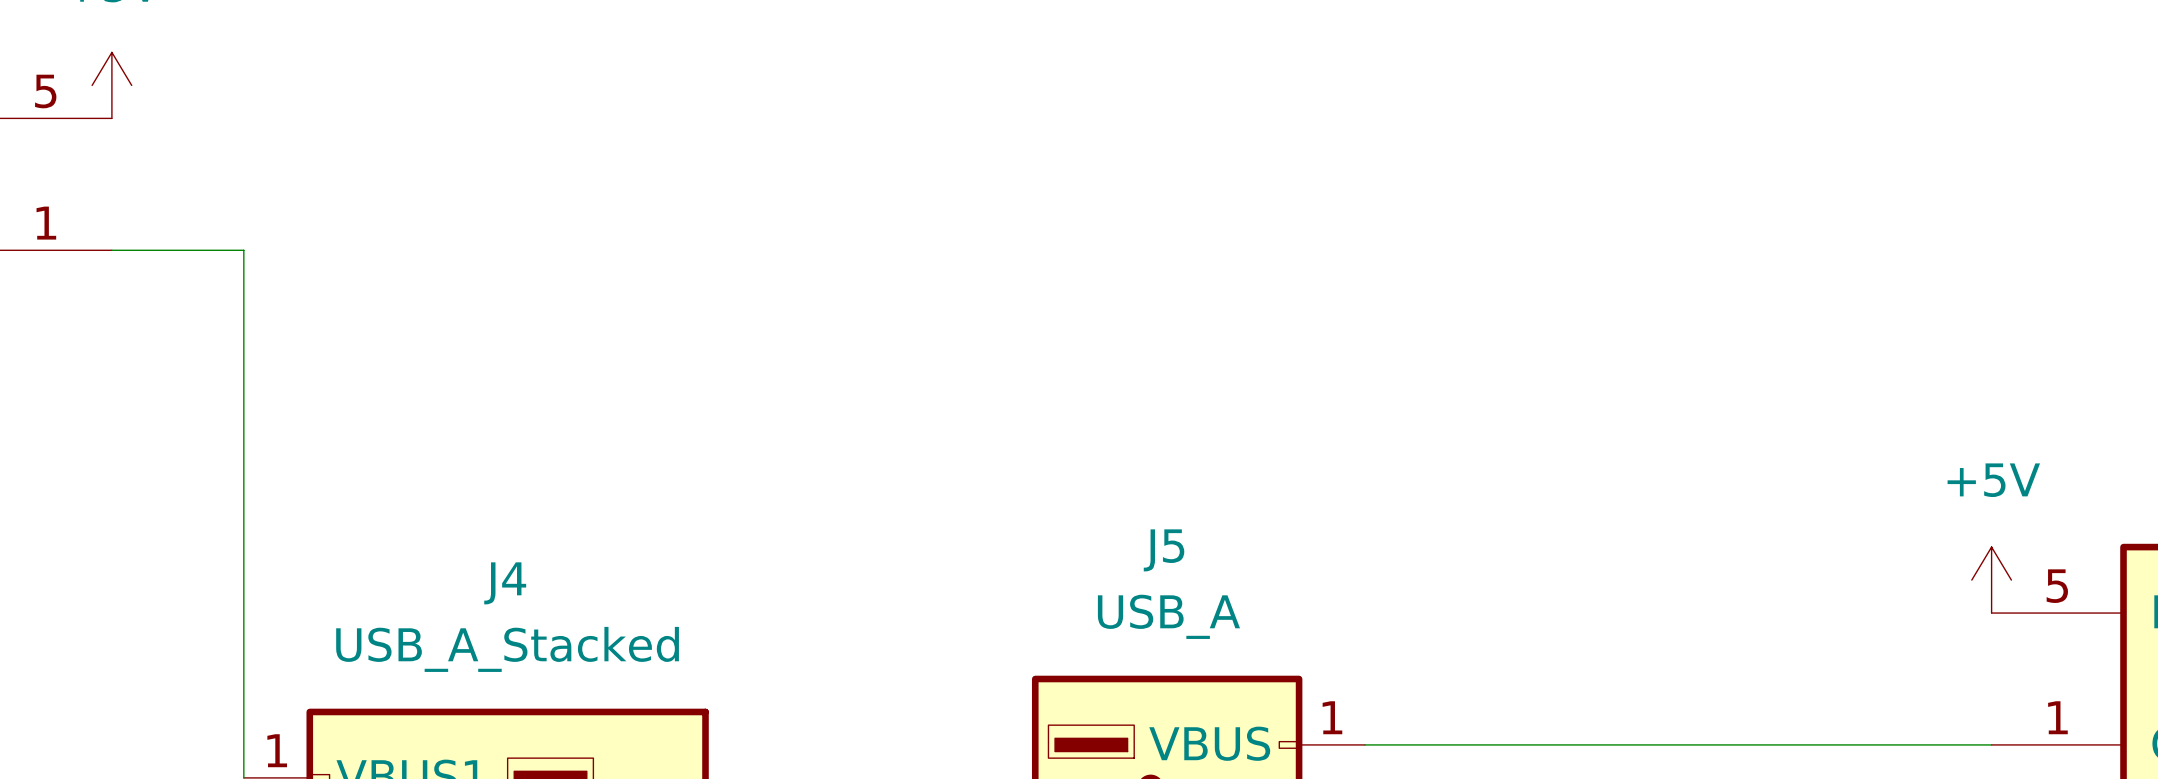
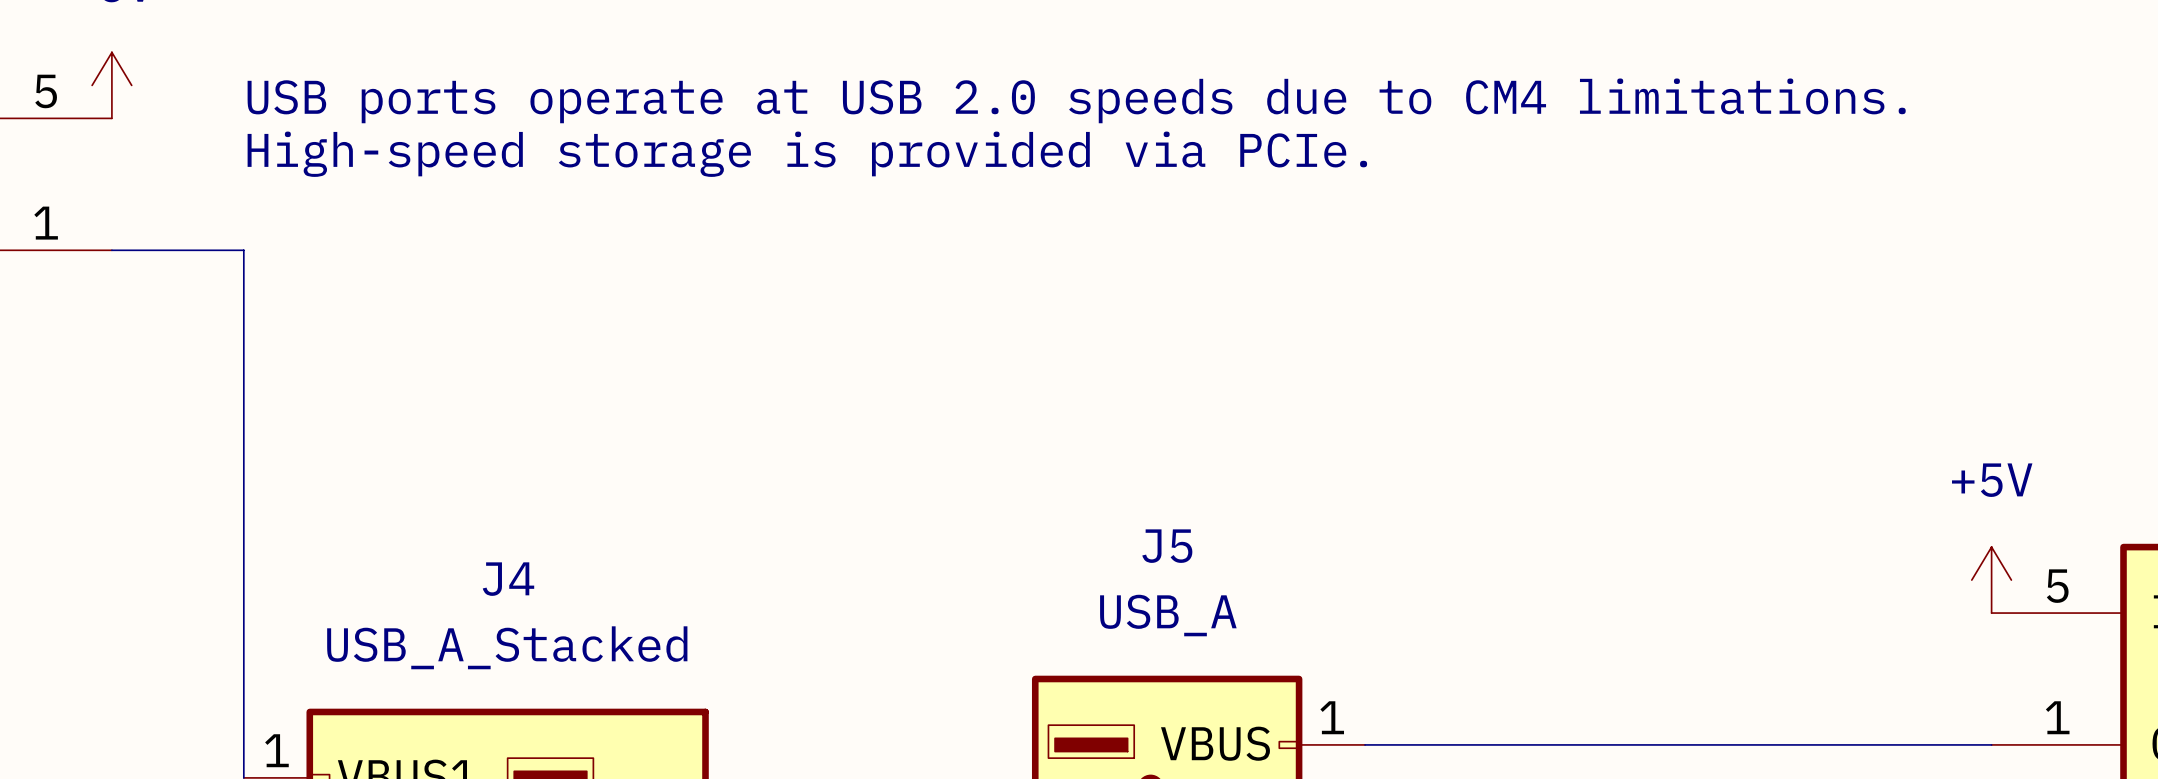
text: none -> USB ports operate at USB 2.0 speeds due to CM4 limitations. (1076, 100)
text: none -> High-speed storage is provided via PCIe. (807, 154)

